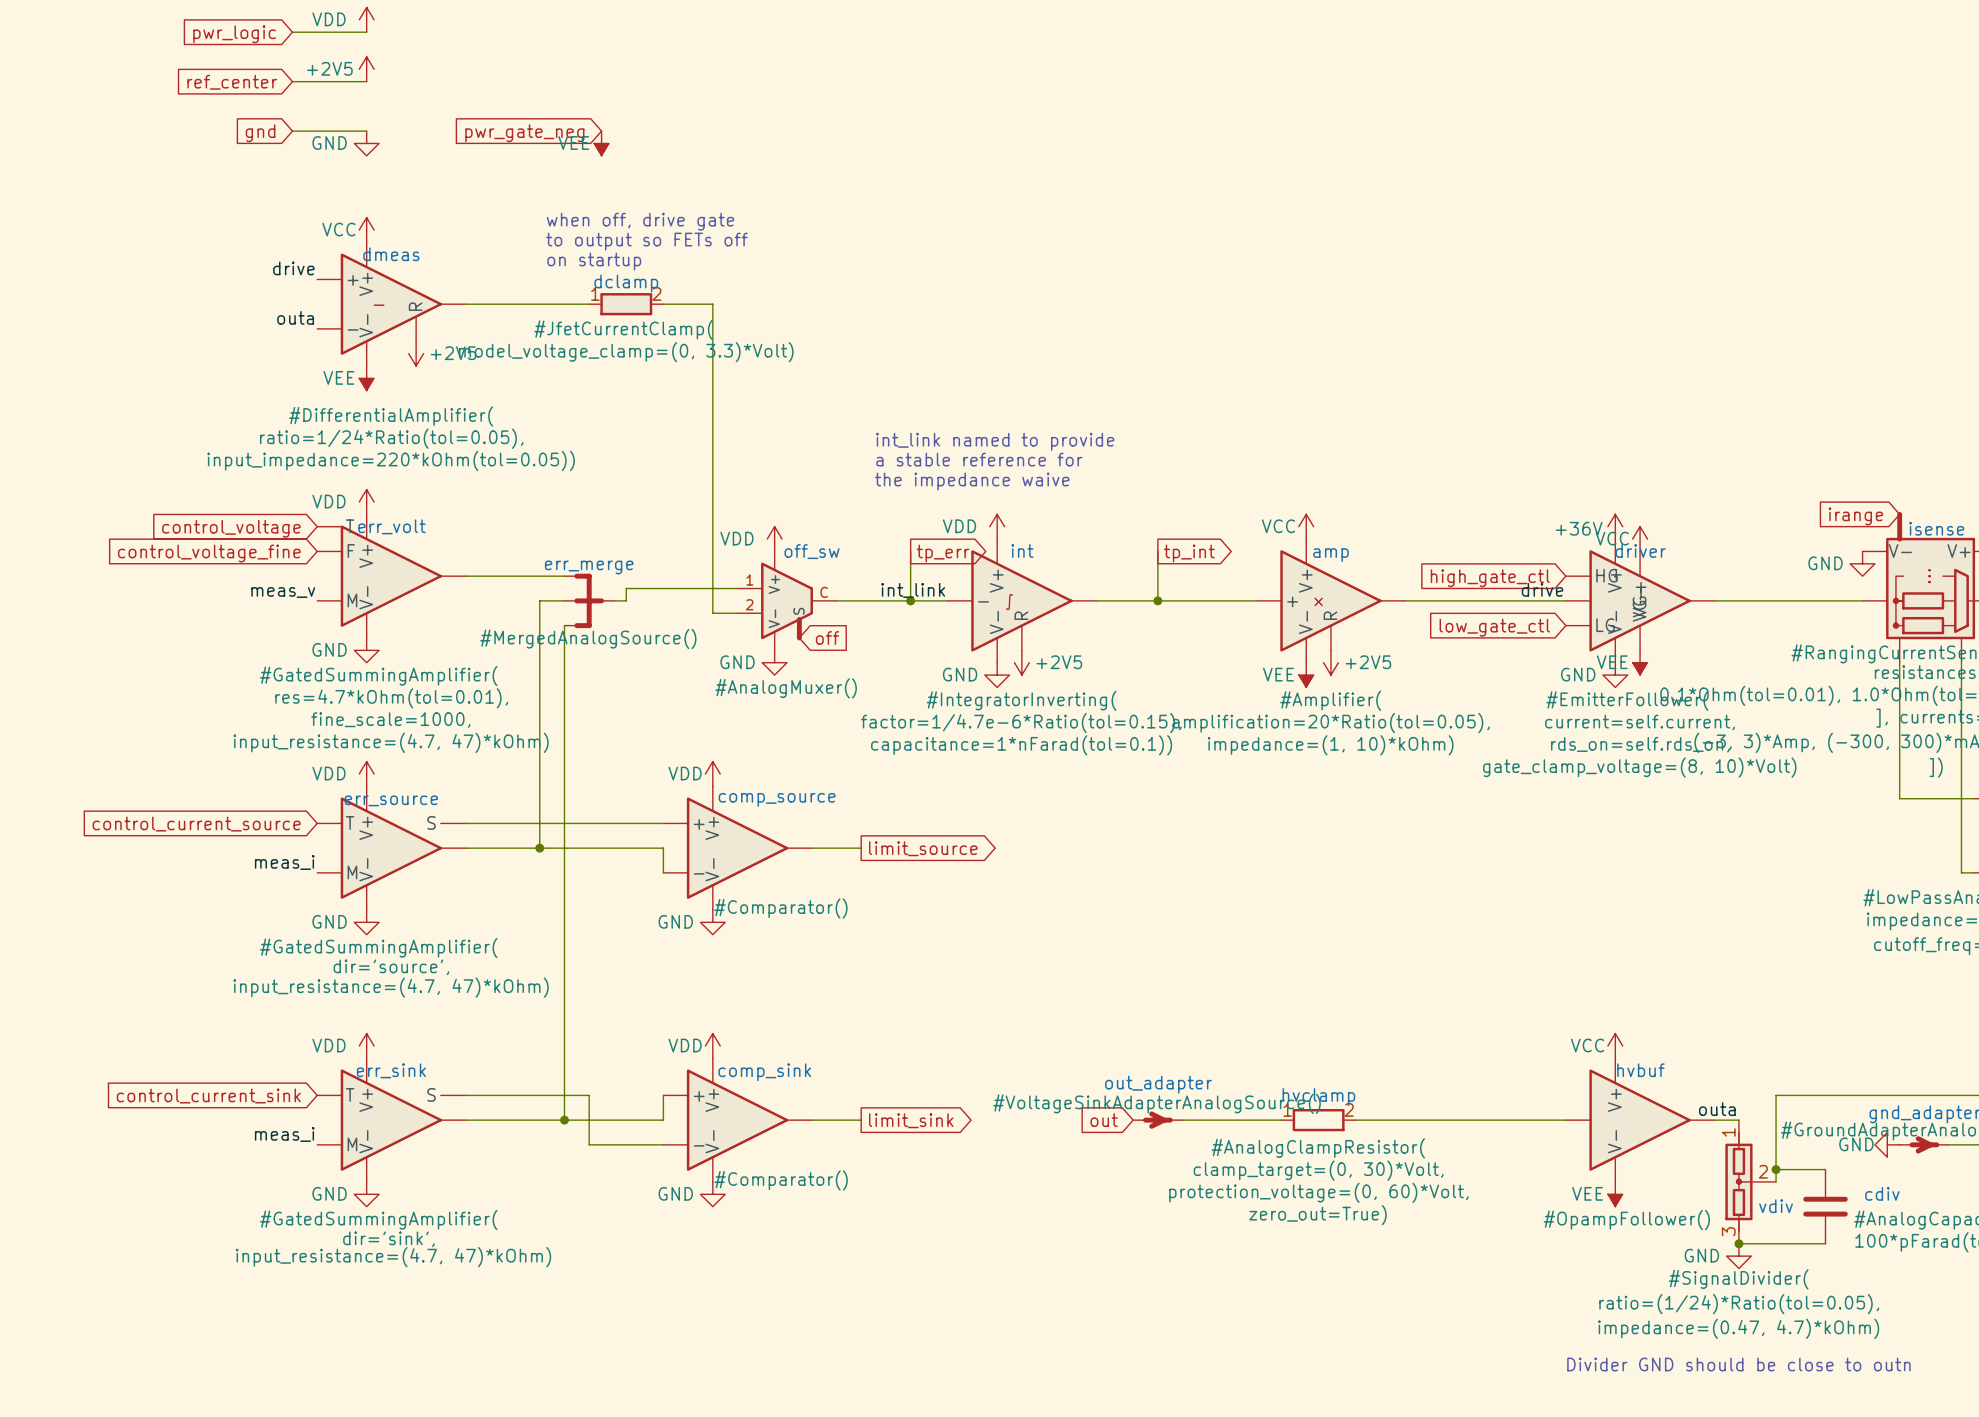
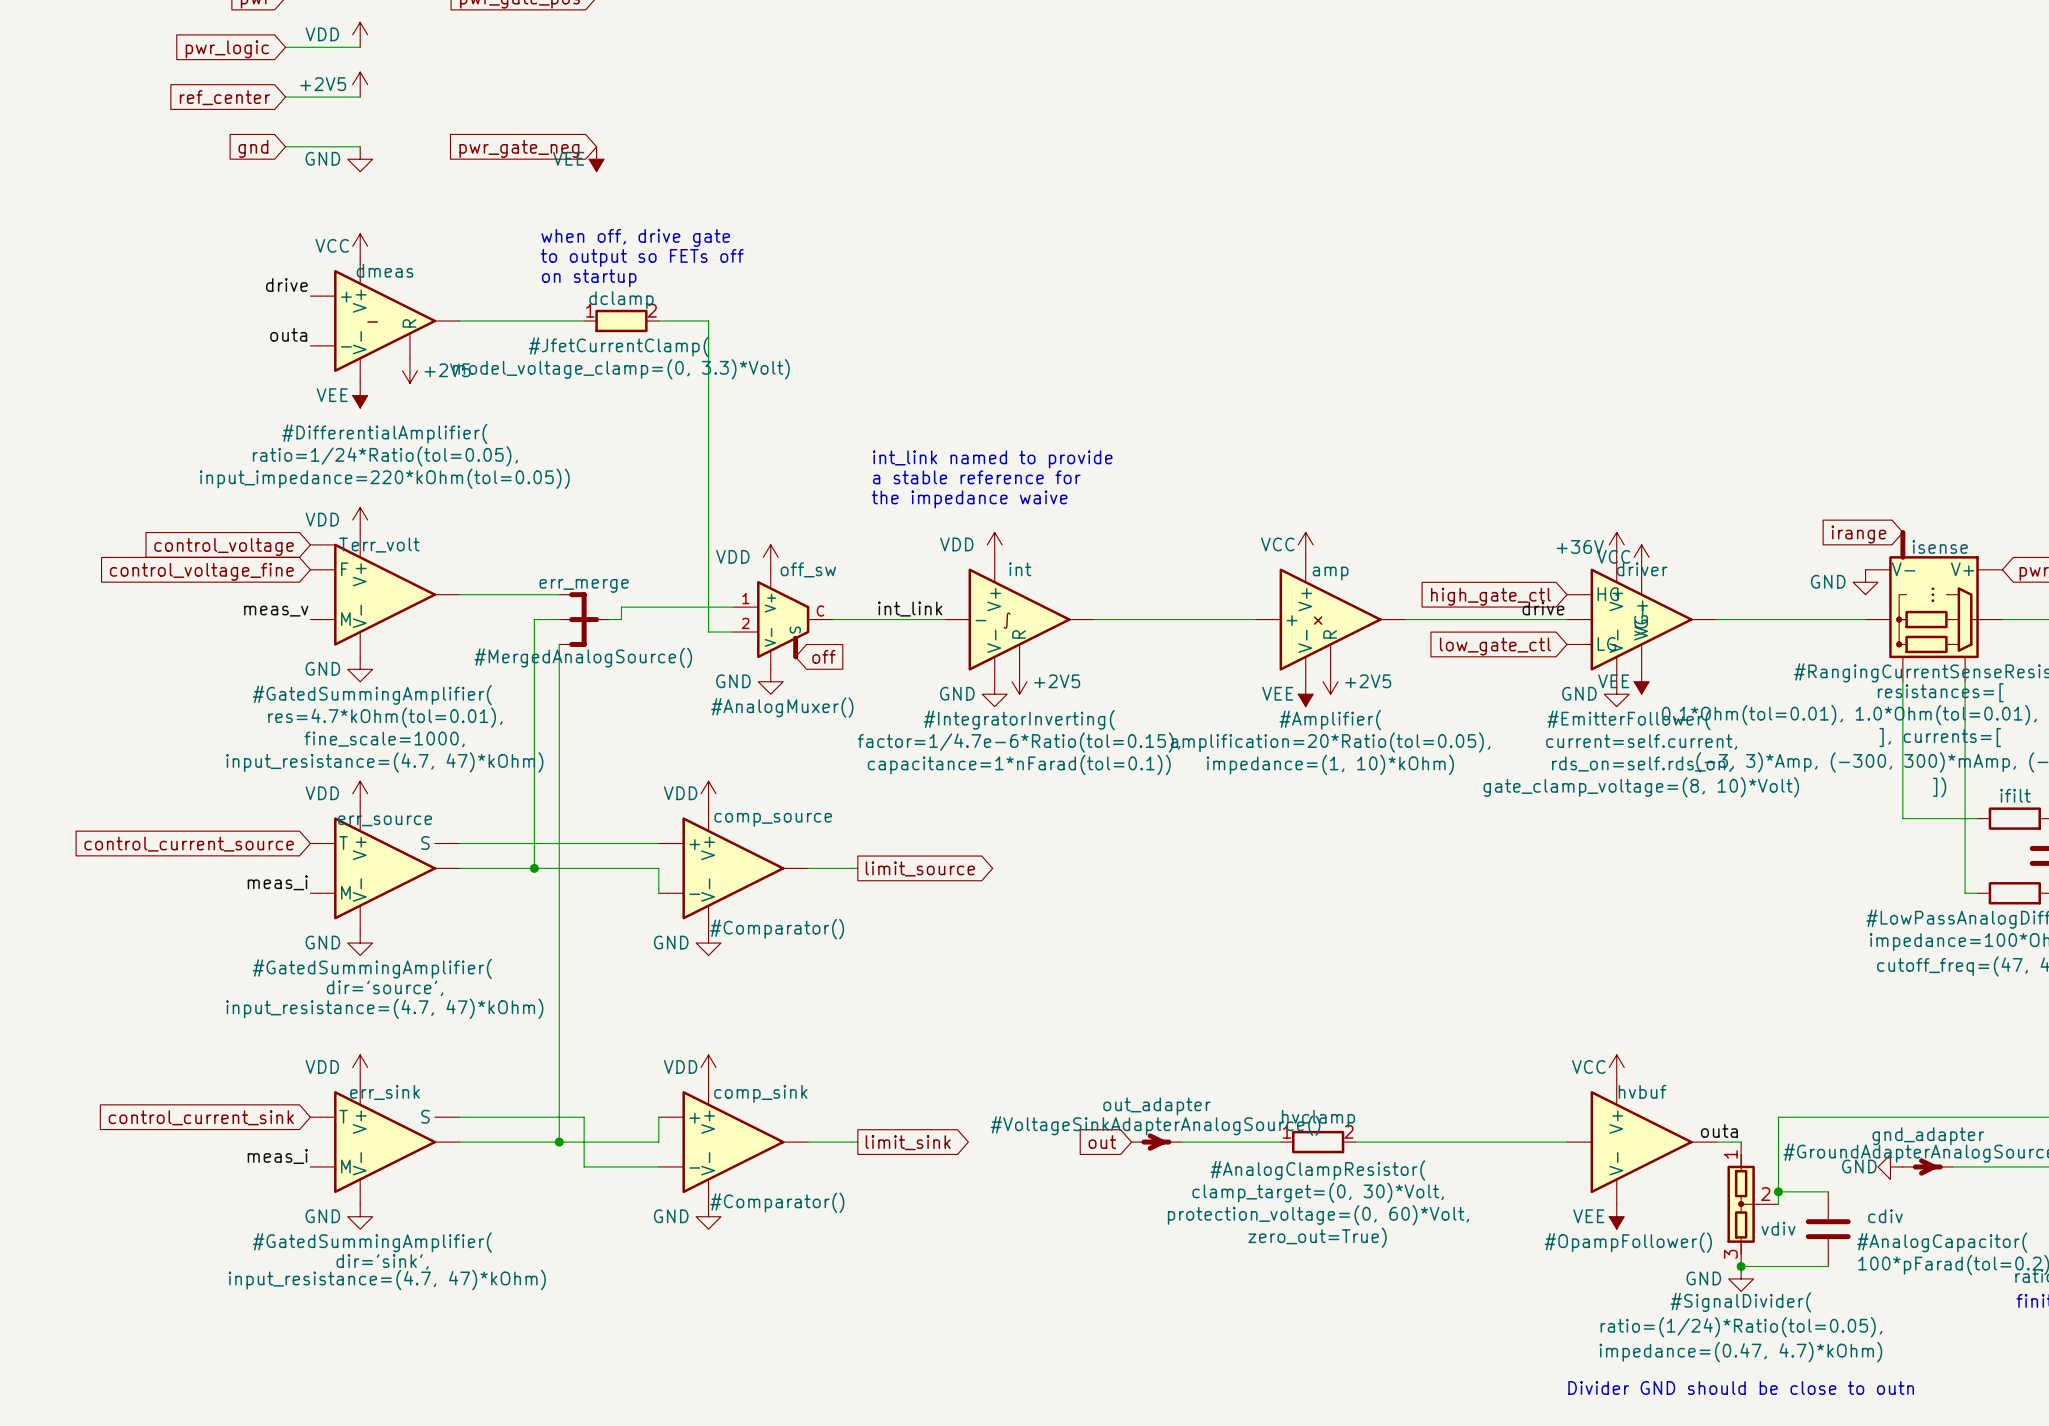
wire: (910, 551) (910, 600) -> none
wire: (1157, 551) (1157, 600) -> none
global label: tp_err (943, 553) -> none
global label: tp_int (1189, 553) -> none
junction: (910, 600) -> none
junction: (1157, 600) -> none

